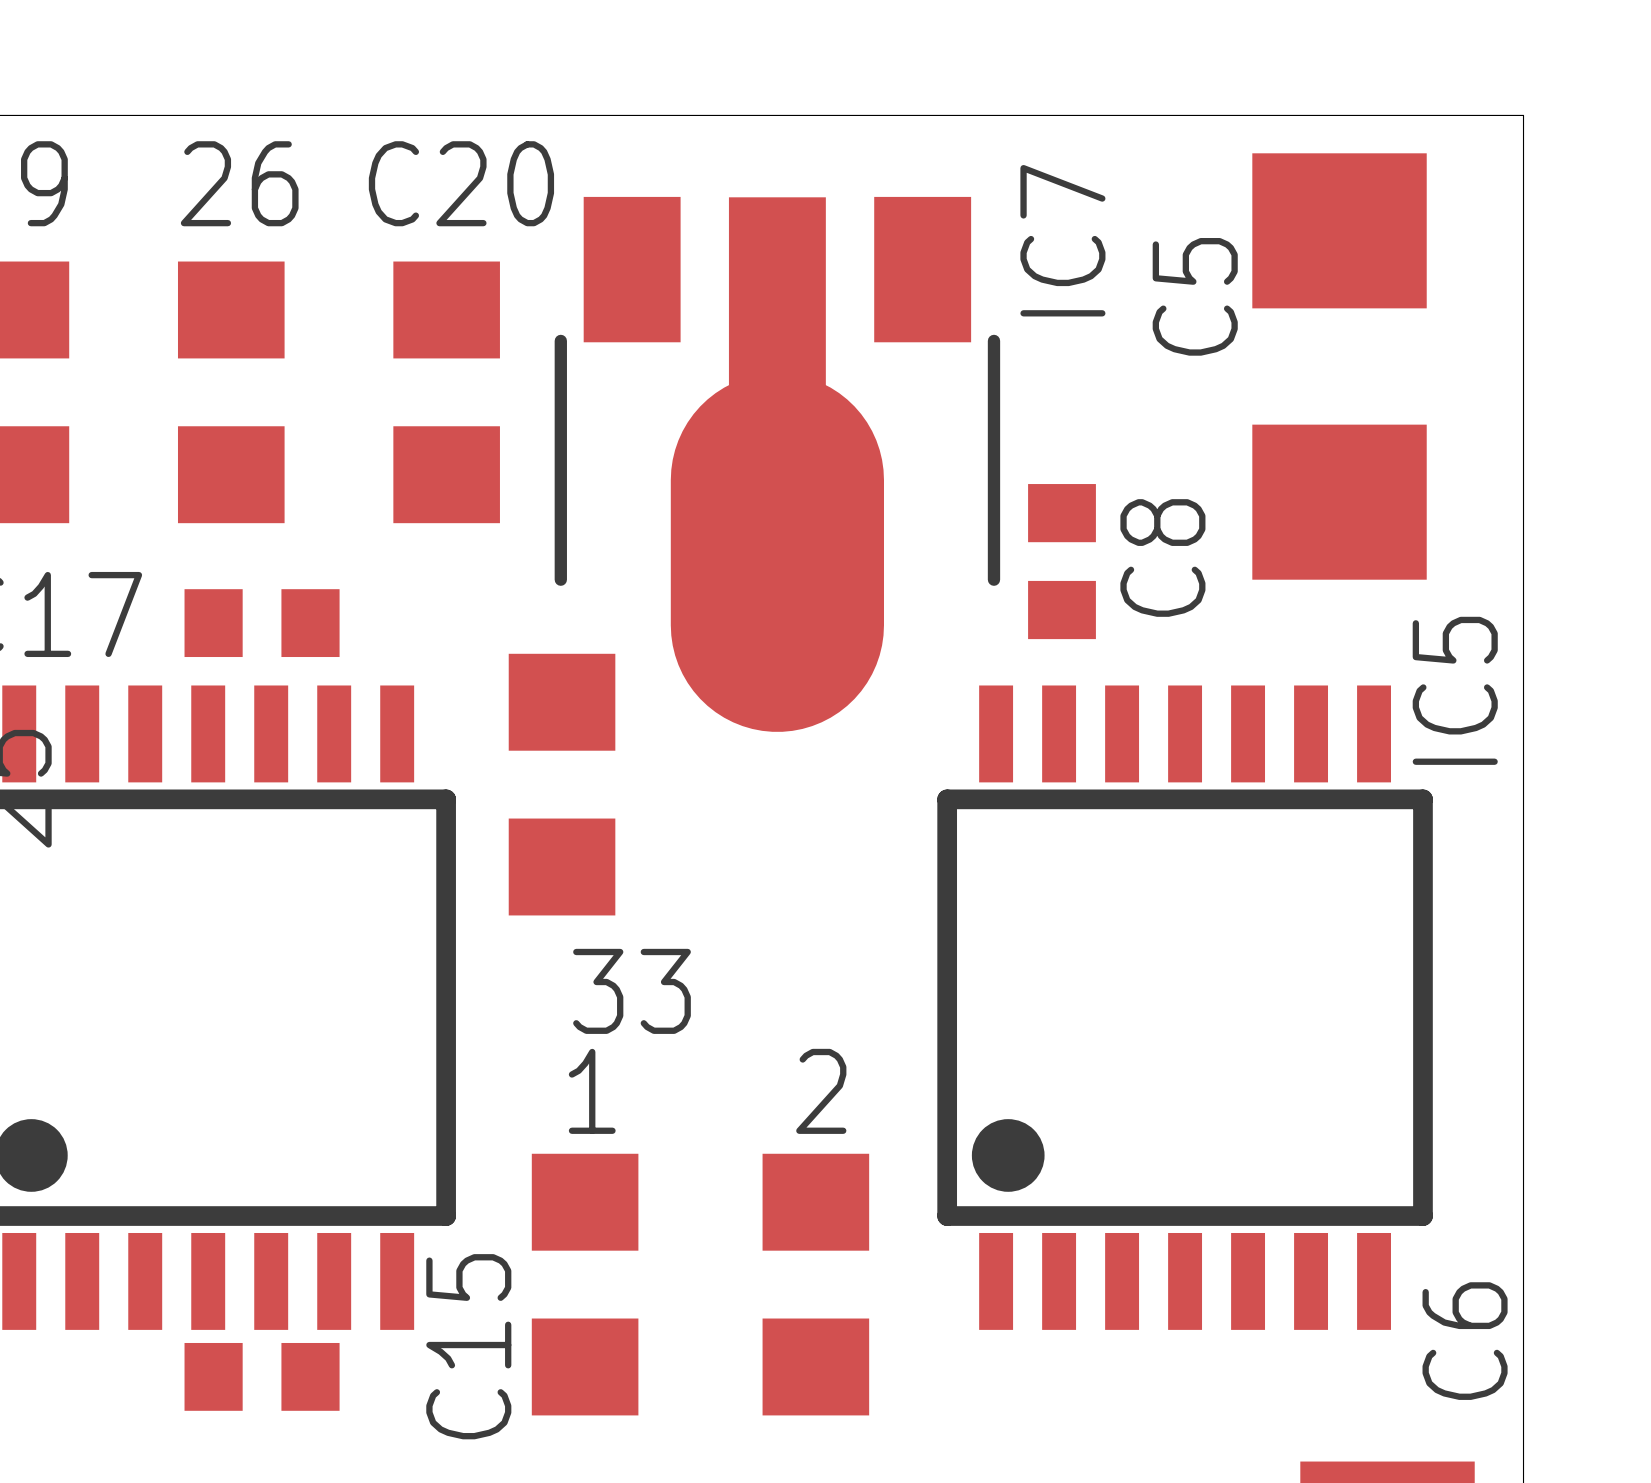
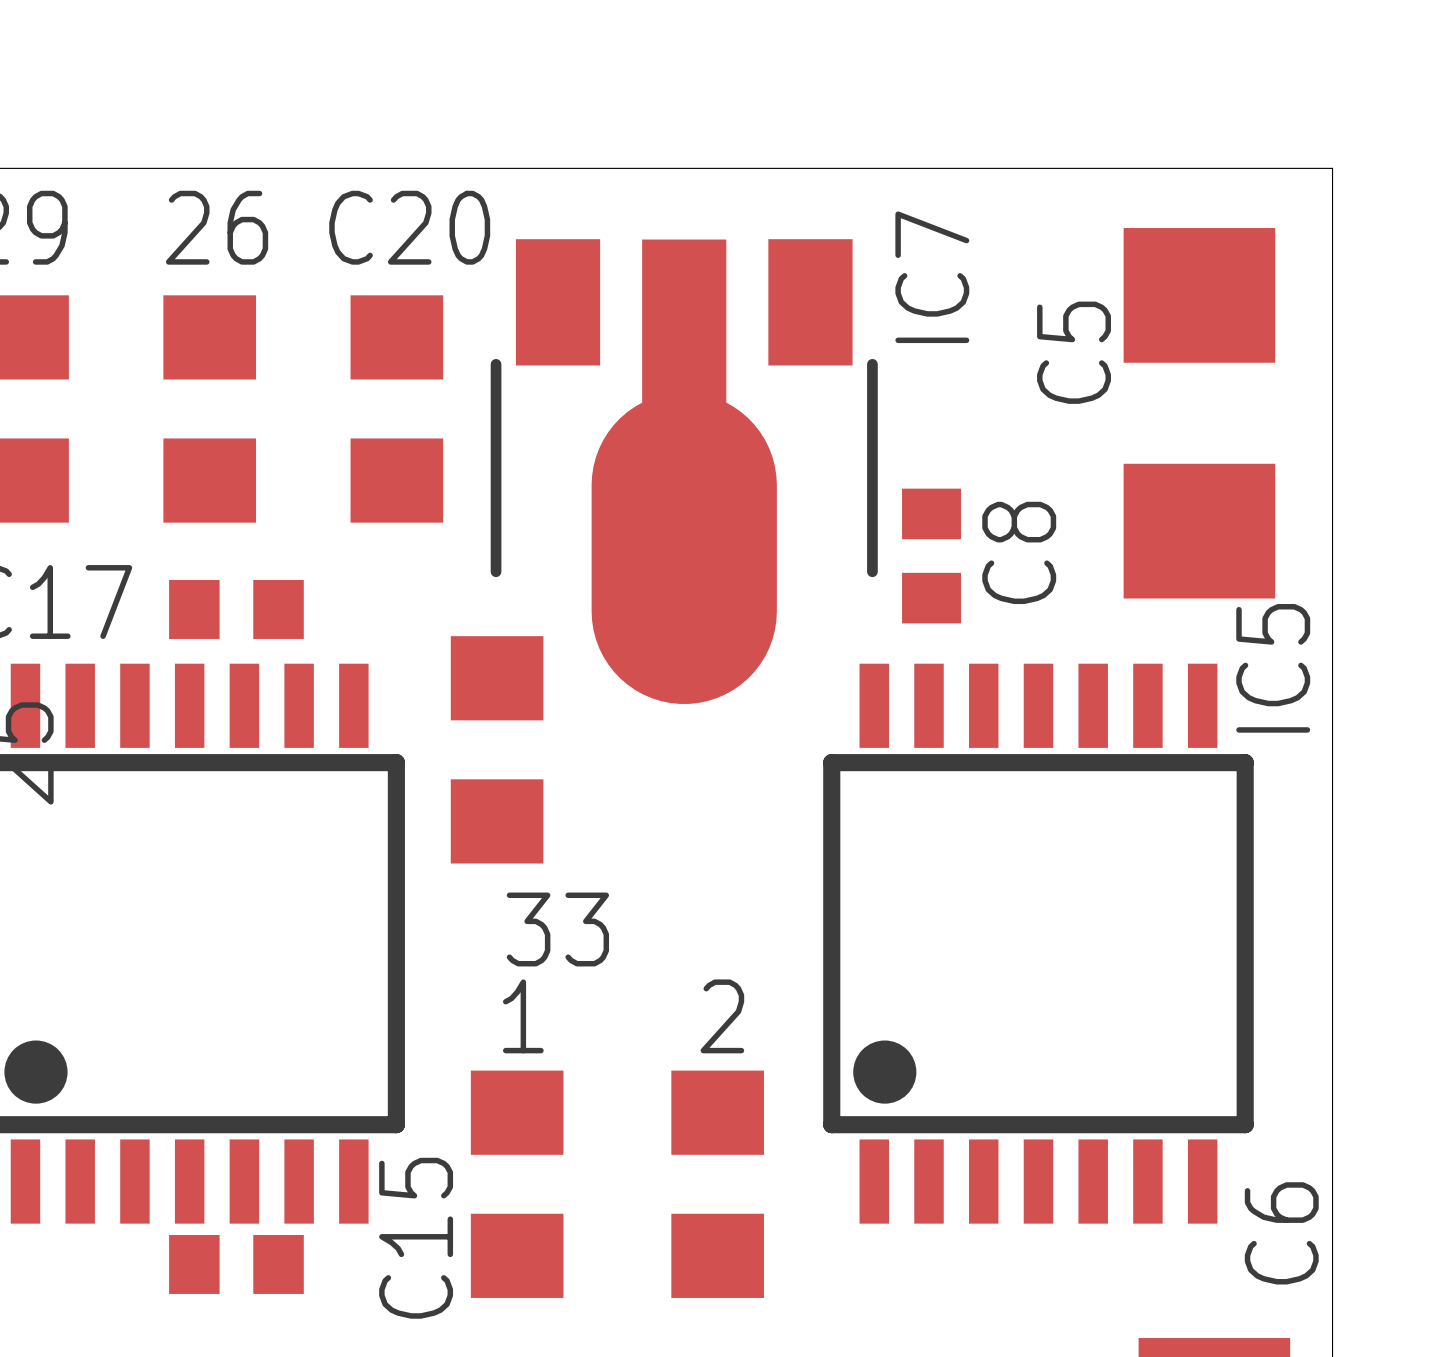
C5 position: (1339, 366) -> (1199, 413)

